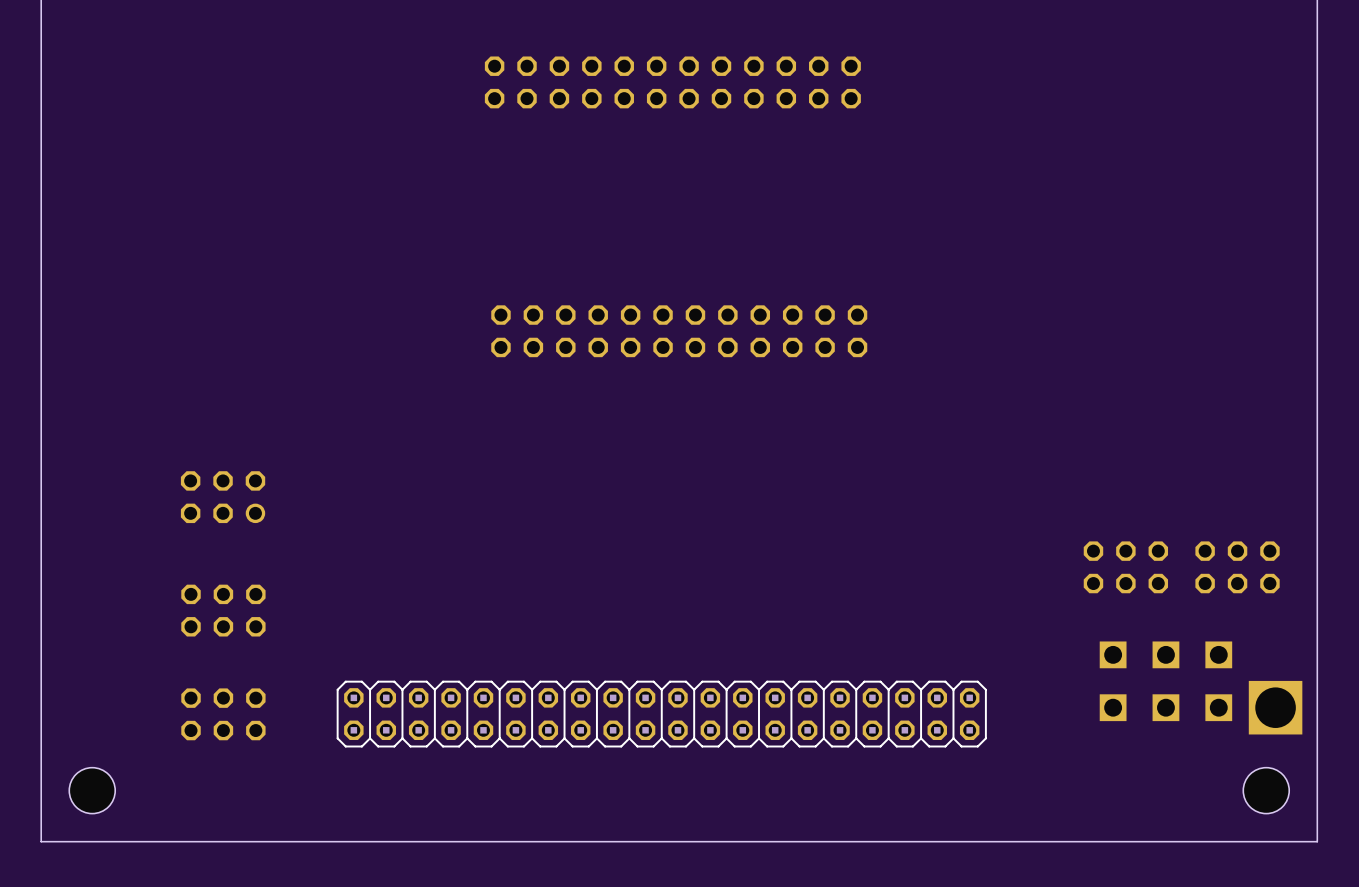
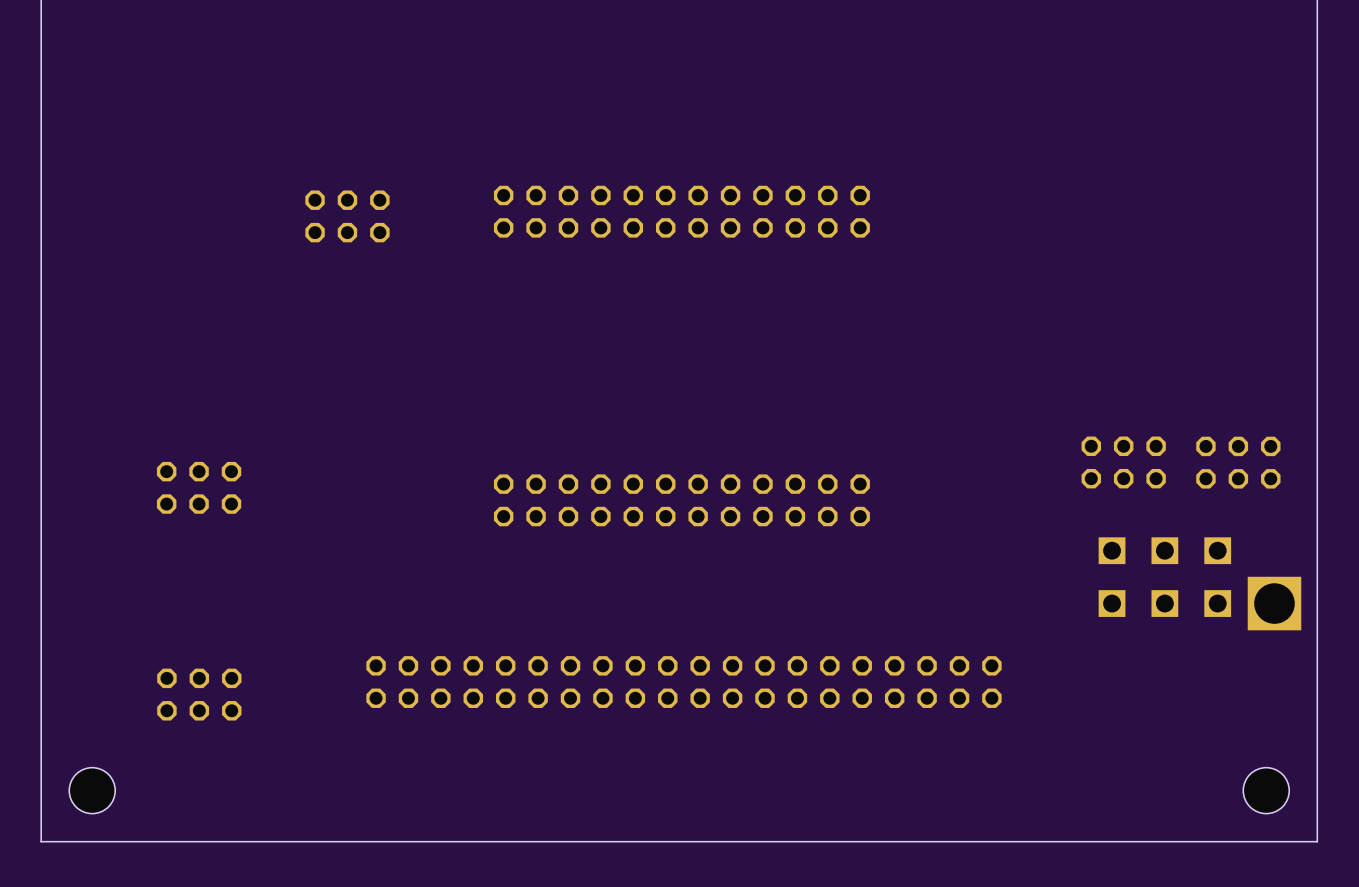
part: (672, 82) -> none
part: none -> (681, 211)
part: none -> (347, 216)
part: (679, 331) -> none
part: none -> (1123, 462)
part: none -> (1238, 462)
part: none -> (199, 487)
part: (223, 497) -> none
part: none -> (681, 500)
part: (1125, 567) -> none
part: (1237, 567) -> none
part: (223, 610) -> none
part position: (1201, 687) -> (1199, 583)
part position: (223, 714) -> (199, 694)
part side: bottom (661, 714) -> top (683, 682)

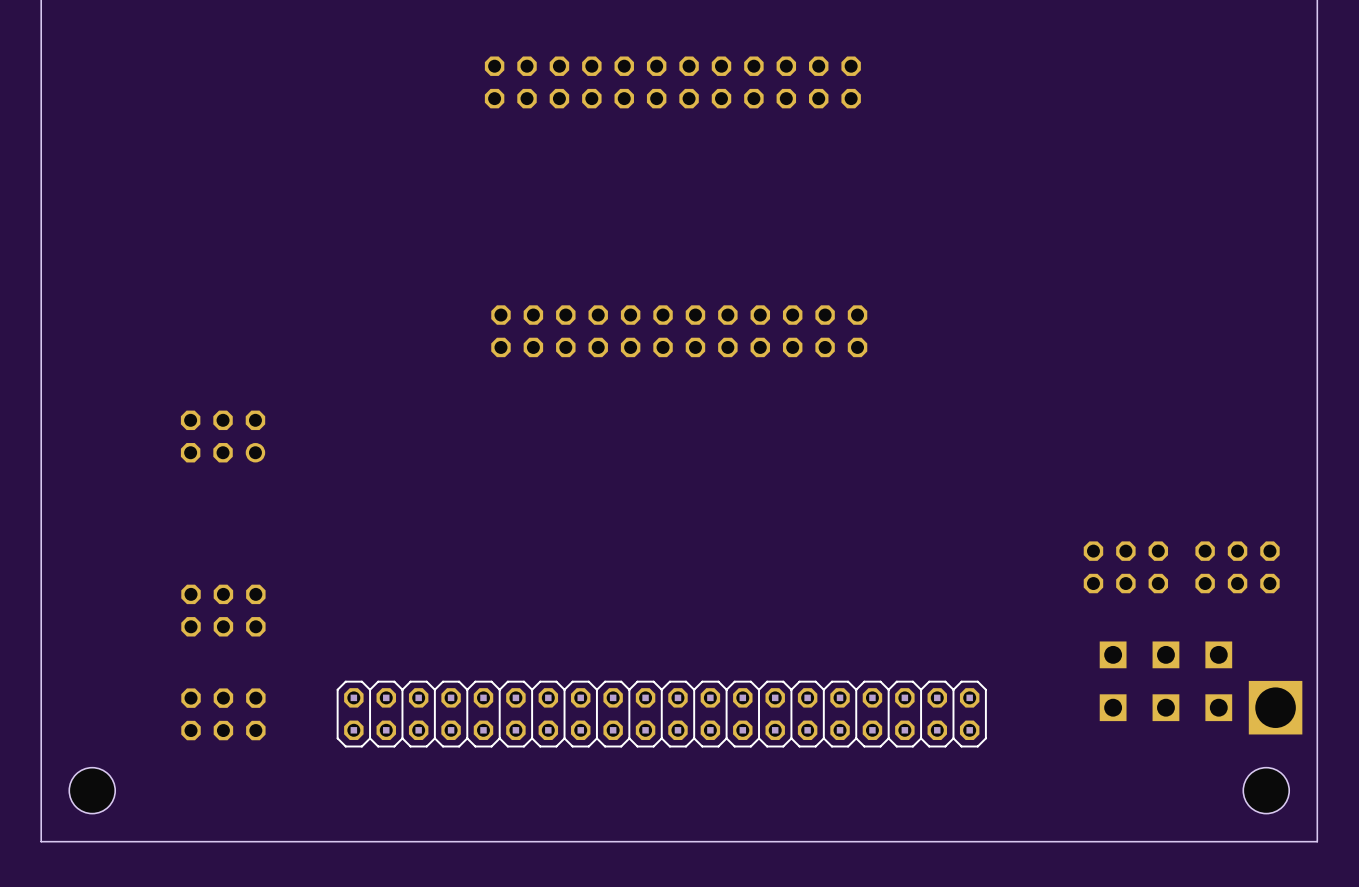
part: none -> (672, 82)
part: (681, 211) -> none
part: (347, 216) -> none
part: none -> (679, 331)
part: none -> (223, 436)
part: (1123, 462) -> none
part: (1238, 462) -> none
part: (199, 487) -> none
part: (681, 500) -> none
part: none -> (1125, 567)
part: none -> (1237, 567)
part position: (1199, 583) -> (1201, 687)
part: none -> (223, 610)
part side: top (683, 682) -> bottom (661, 714)
part position: (199, 694) -> (223, 714)

